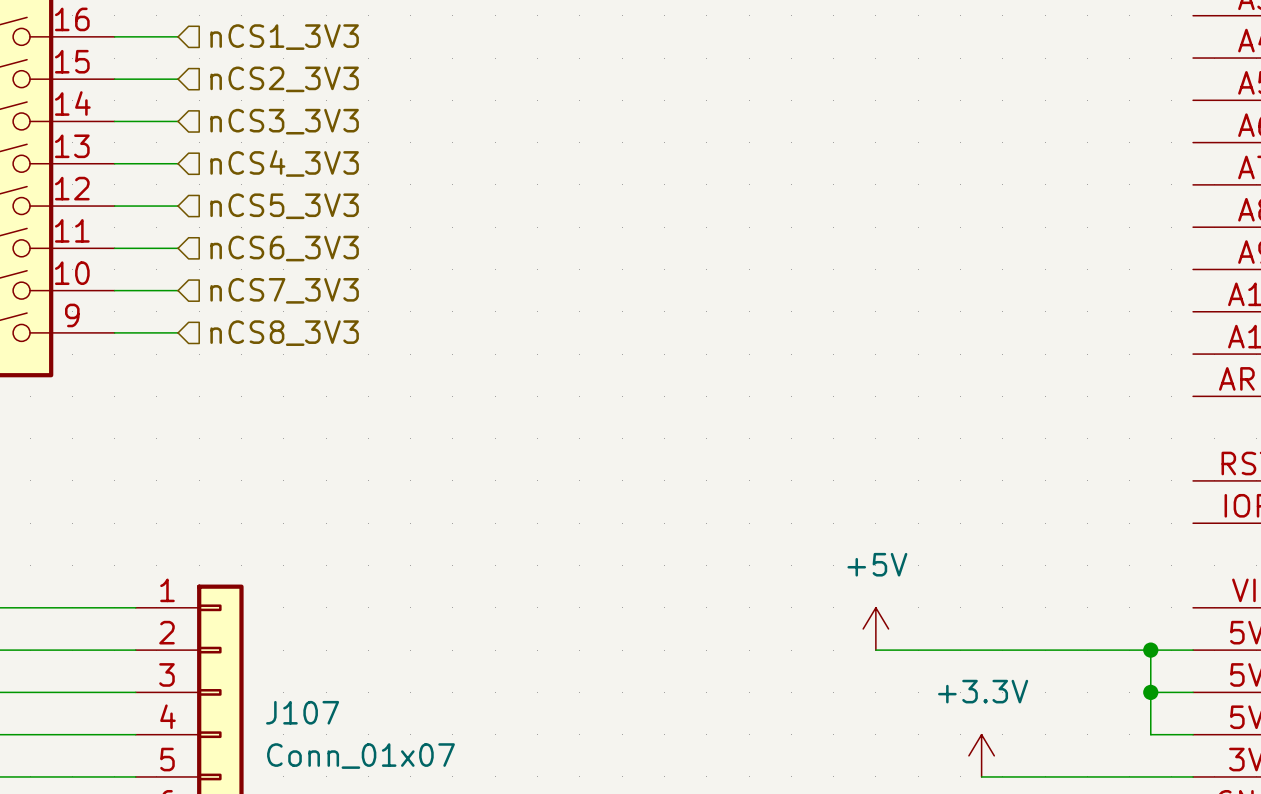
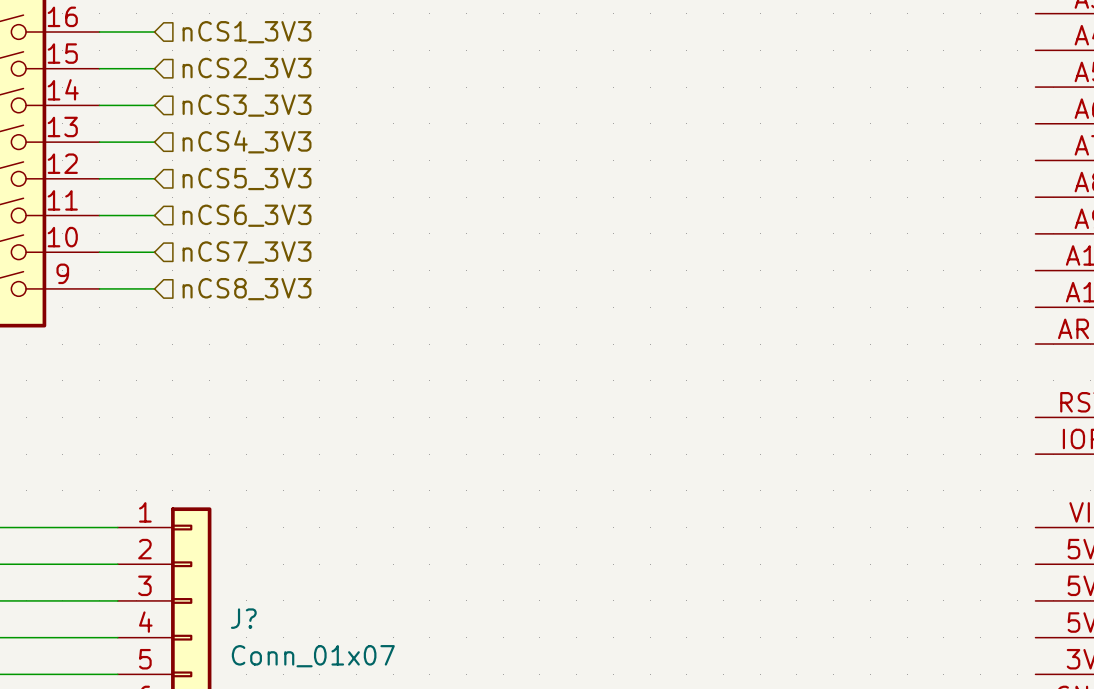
power symbol: +5V (875, 628) -> none
wire: (875, 650) (1193, 650) -> none
wire: (1150, 650) (1150, 734) (1193, 734) -> none
junction: (1150, 650) -> none
wire: (1150, 692) (1193, 692) -> none
junction: (1150, 692) -> none
J107 name: J107 (302, 712) -> J? (243, 618)
power symbol: +3.3V (981, 755) -> none
wire: (981, 776) (1193, 776) -> none

